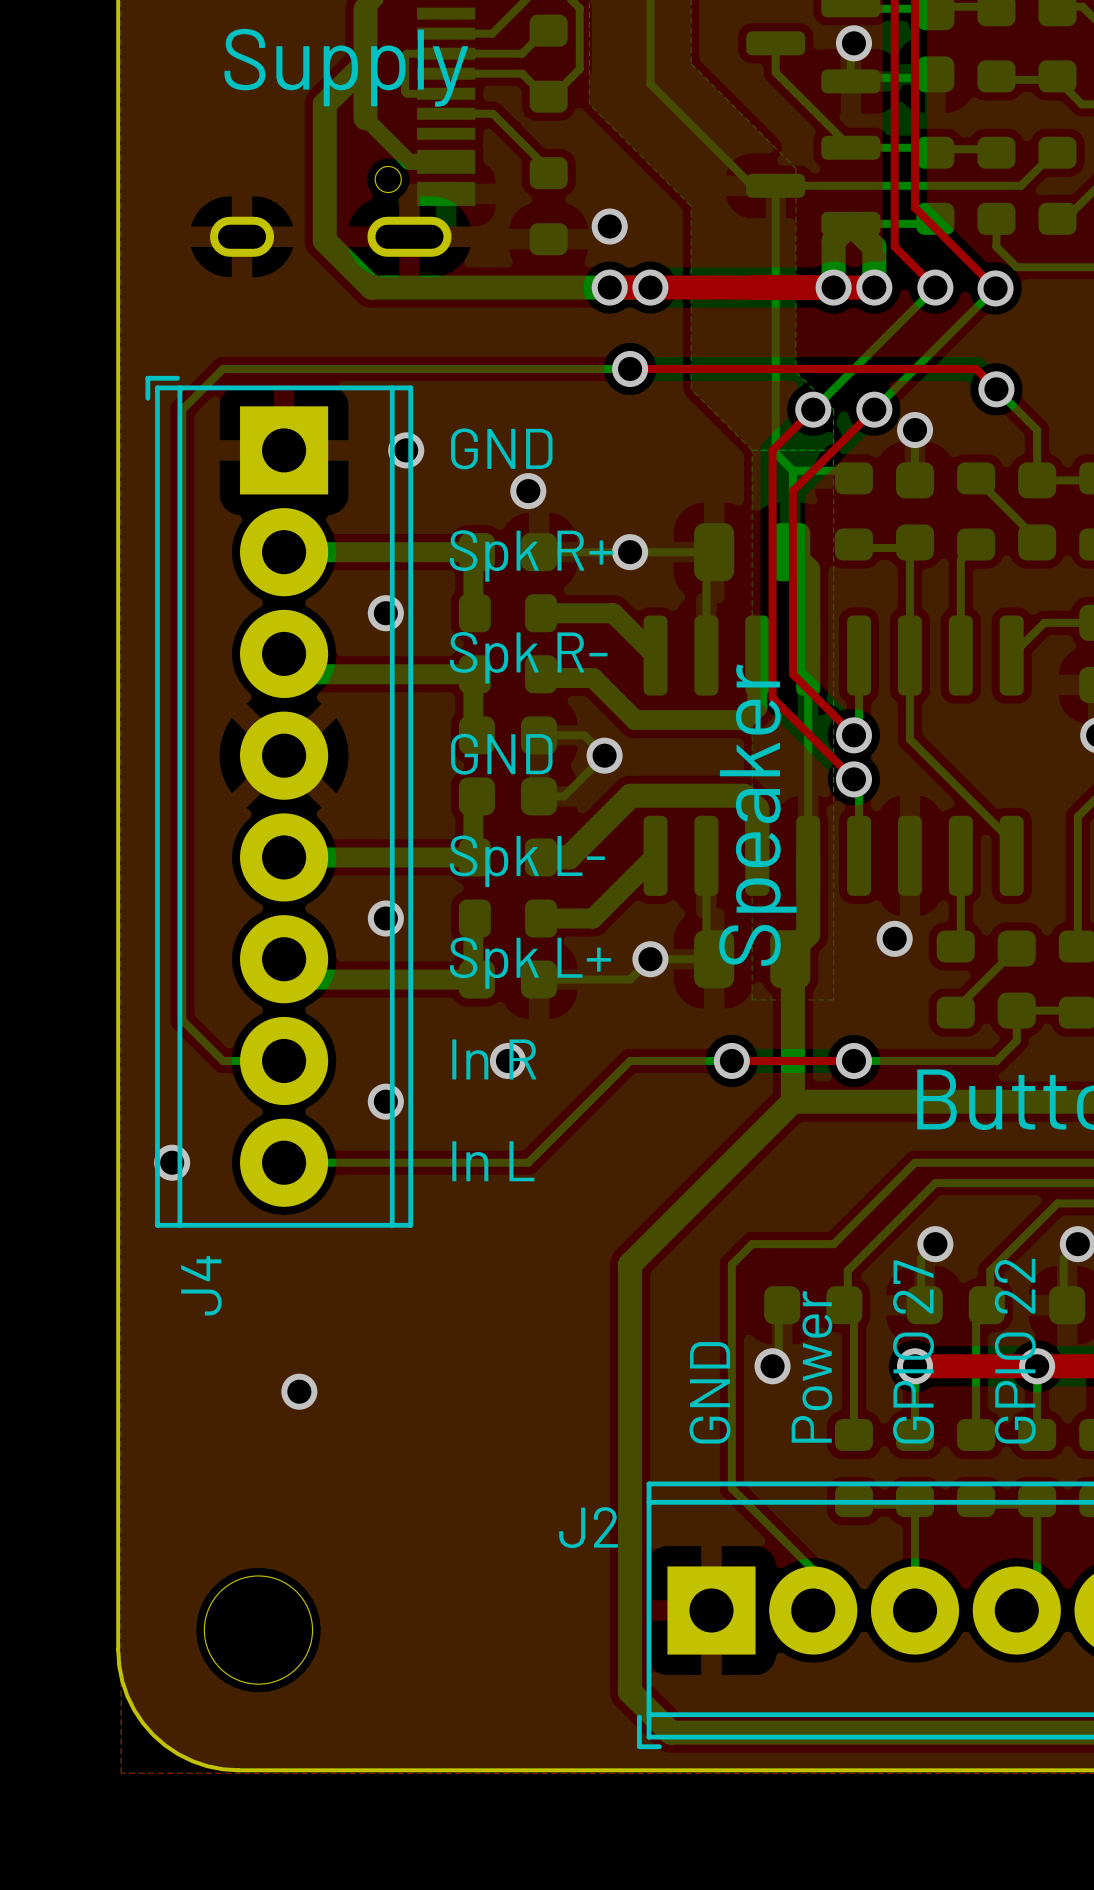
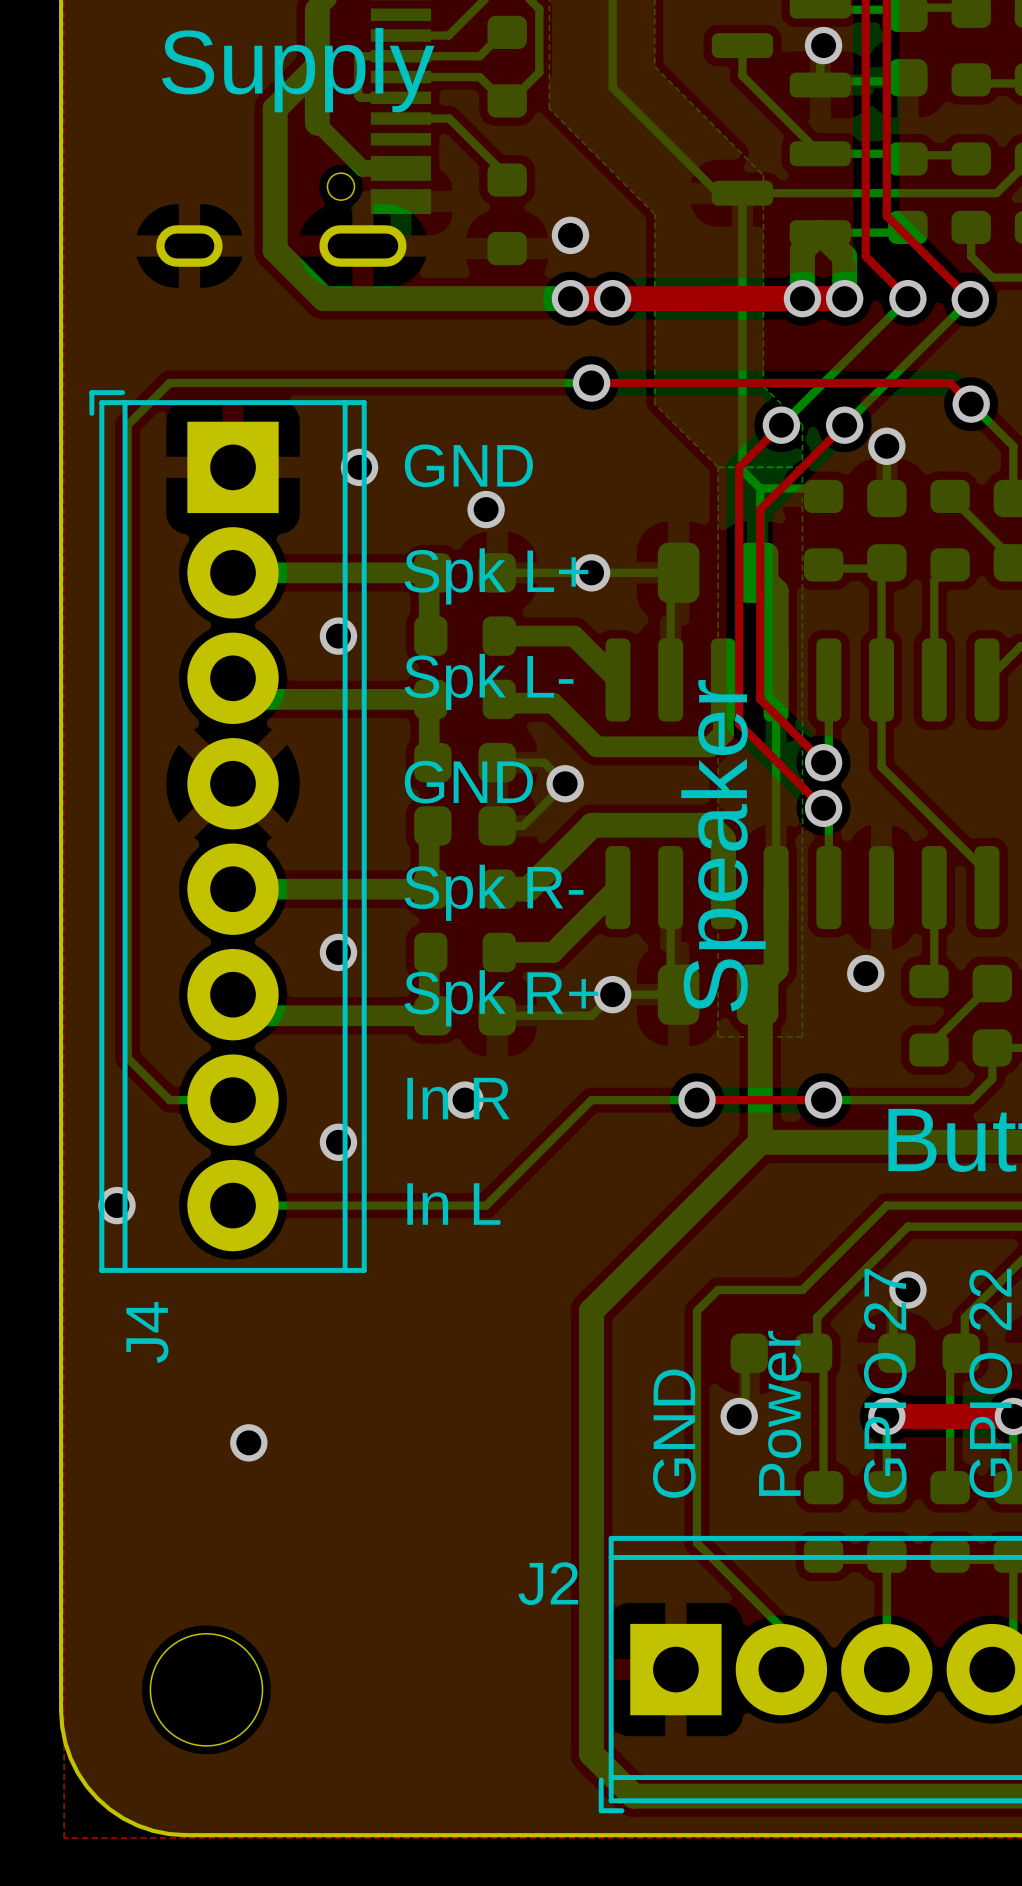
text: Spk R+ (531, 555) -> Spk L+ (496, 576)
text: Spk R- (528, 657) -> Spk L- (488, 681)
text: Spk L- (527, 861) -> Spk R- (493, 892)
text: Spk L+ (530, 963) -> Spk R+ (501, 998)

